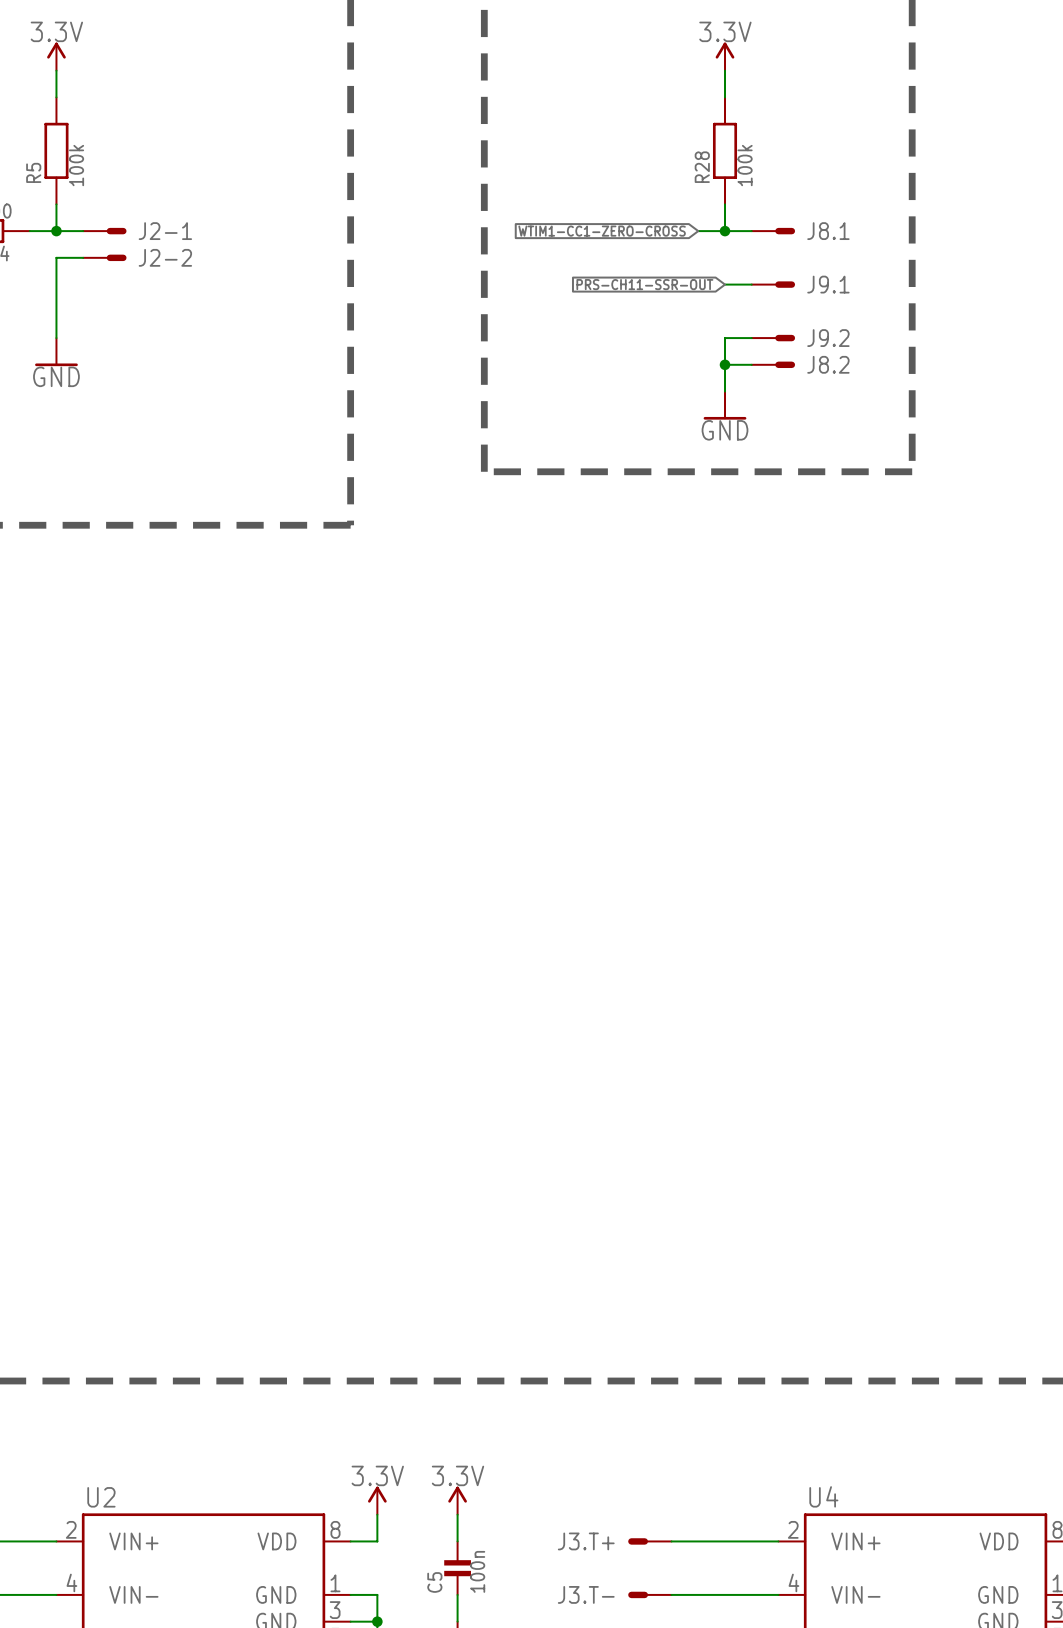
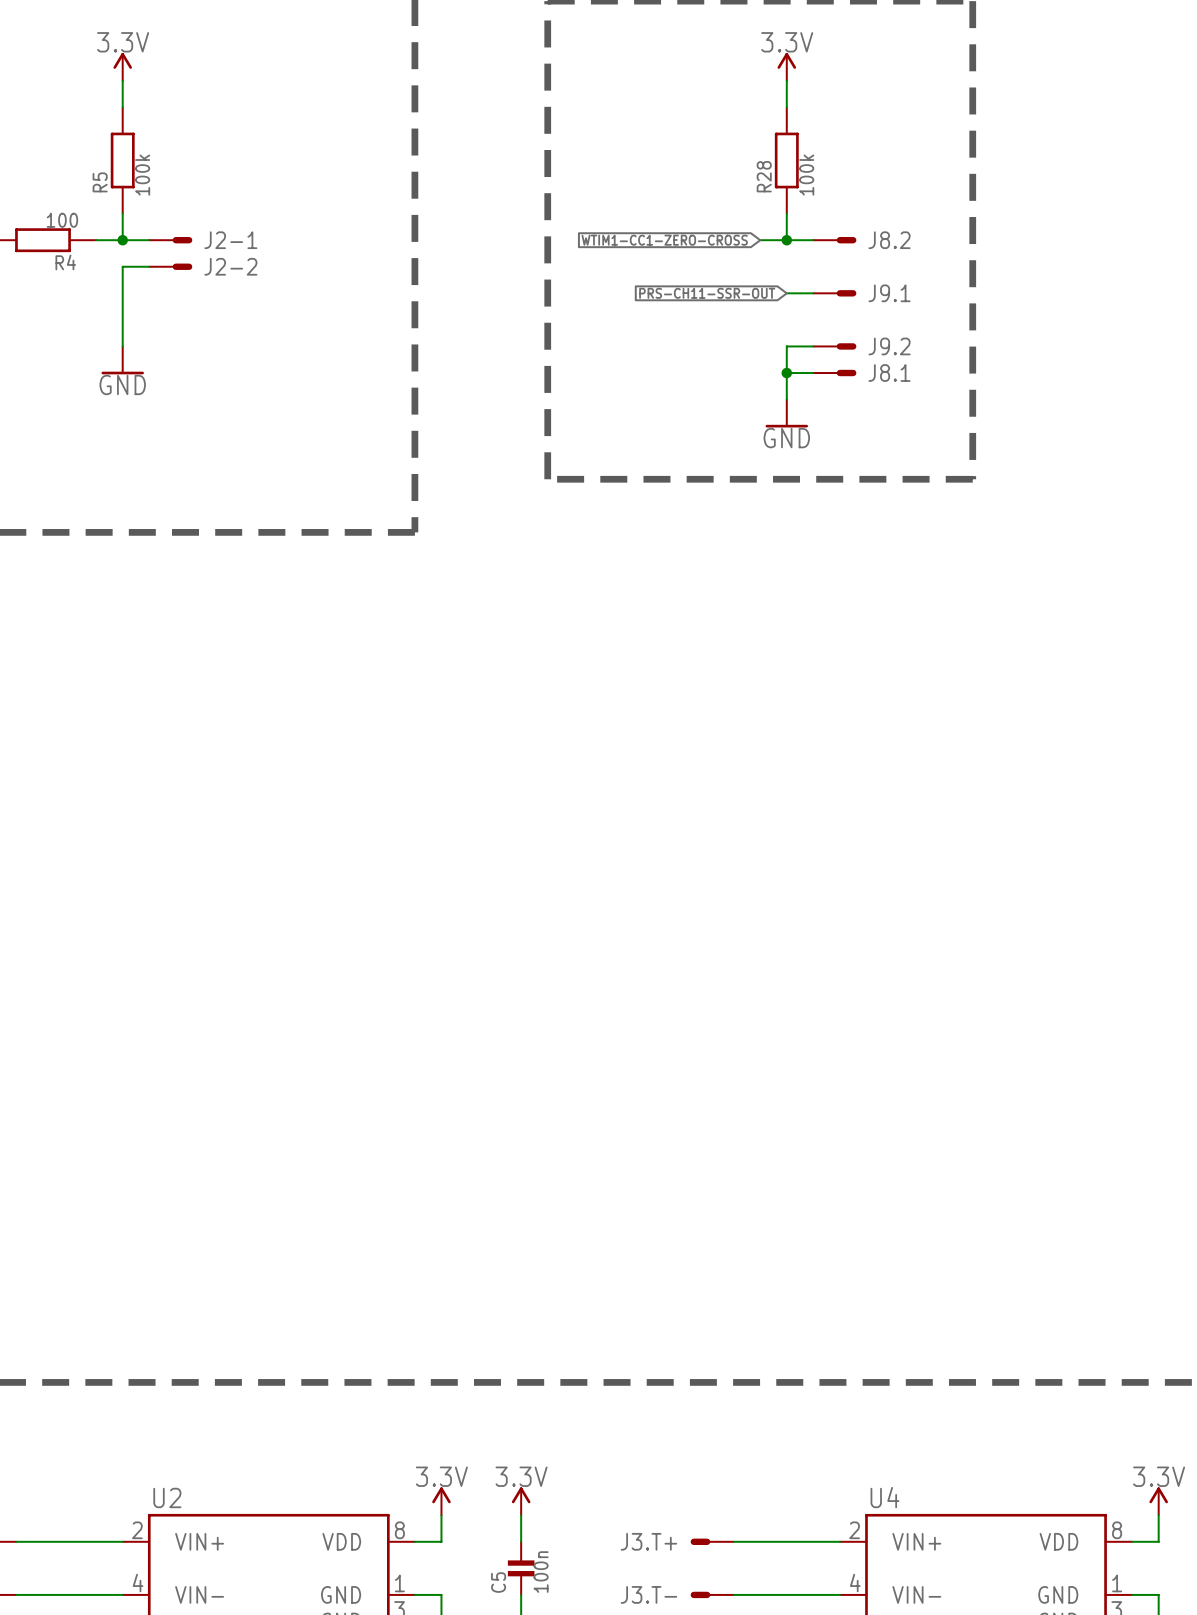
J8.1 name: J8.1 (828, 231) -> J8.2 (889, 240)
J8.2 name: J8.2 (828, 364) -> J8.1 (889, 373)

